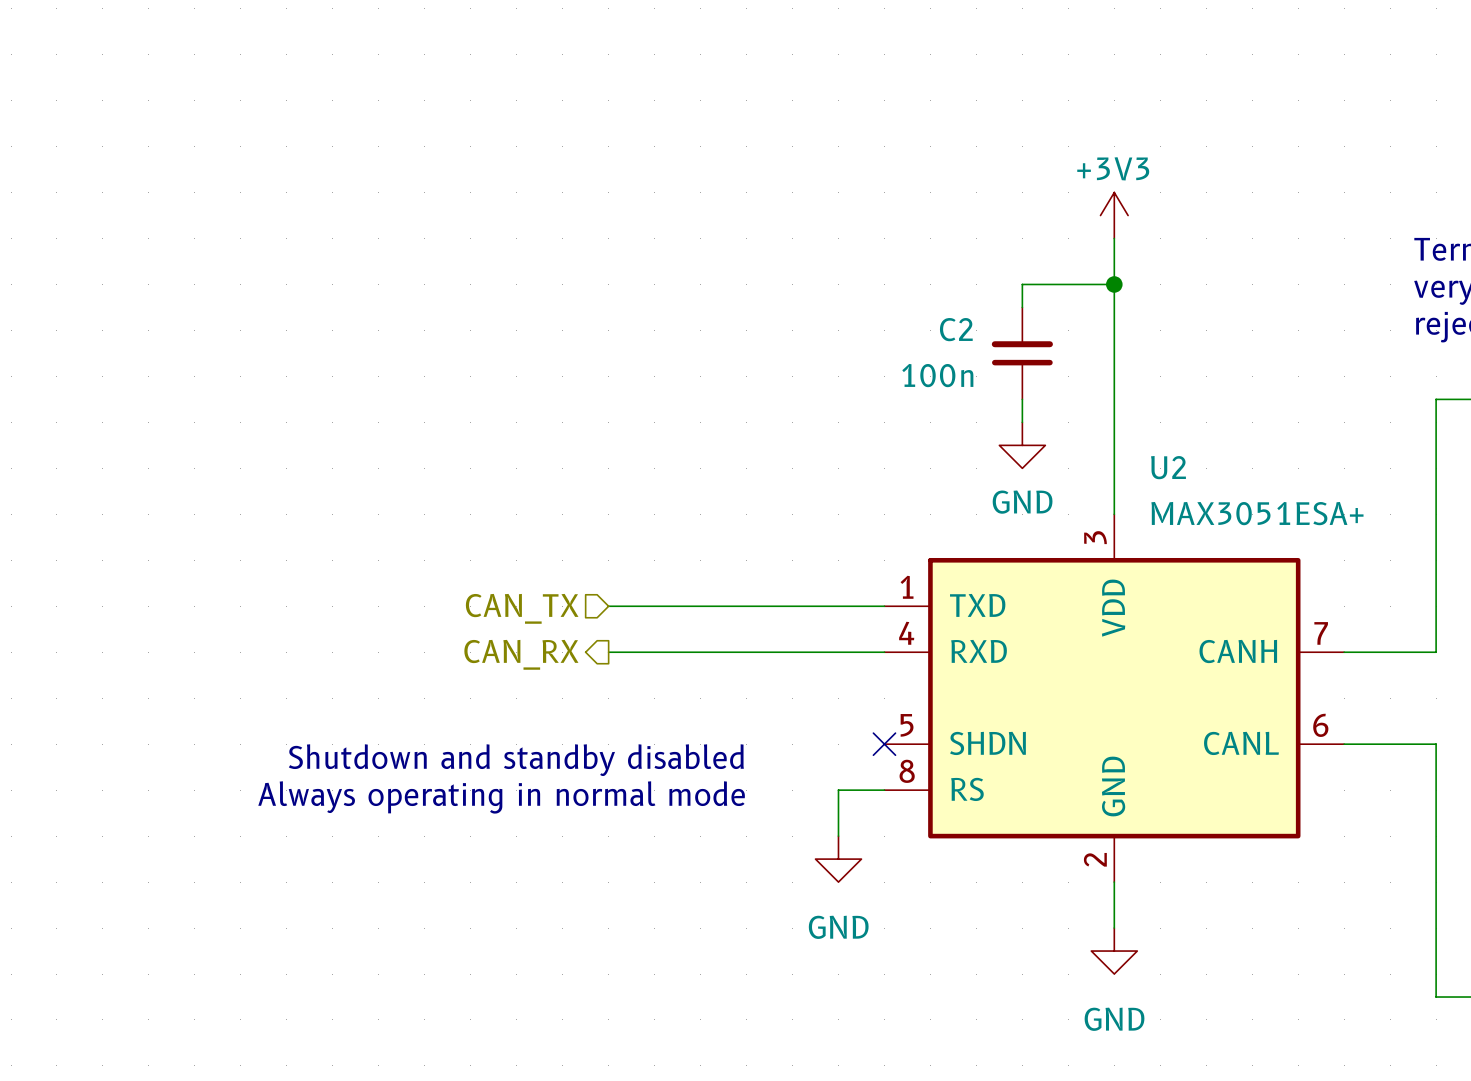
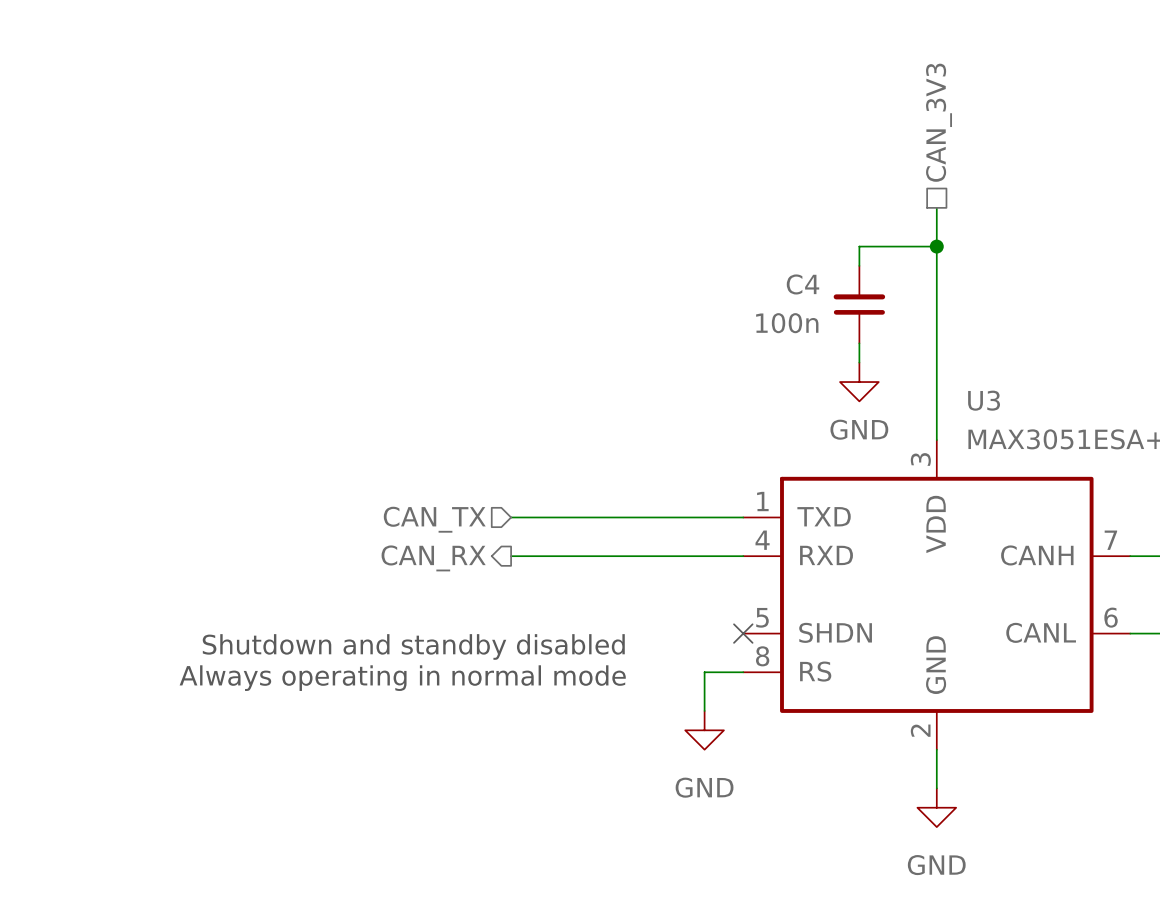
hierarchical label: none -> CAN_3V3 (939, 122)
power symbol: +3V3 (1114, 215) -> none
C2 name: C2 (956, 329) -> C4 (802, 284)
U2 name: U2 (1168, 467) -> U3 (984, 400)

